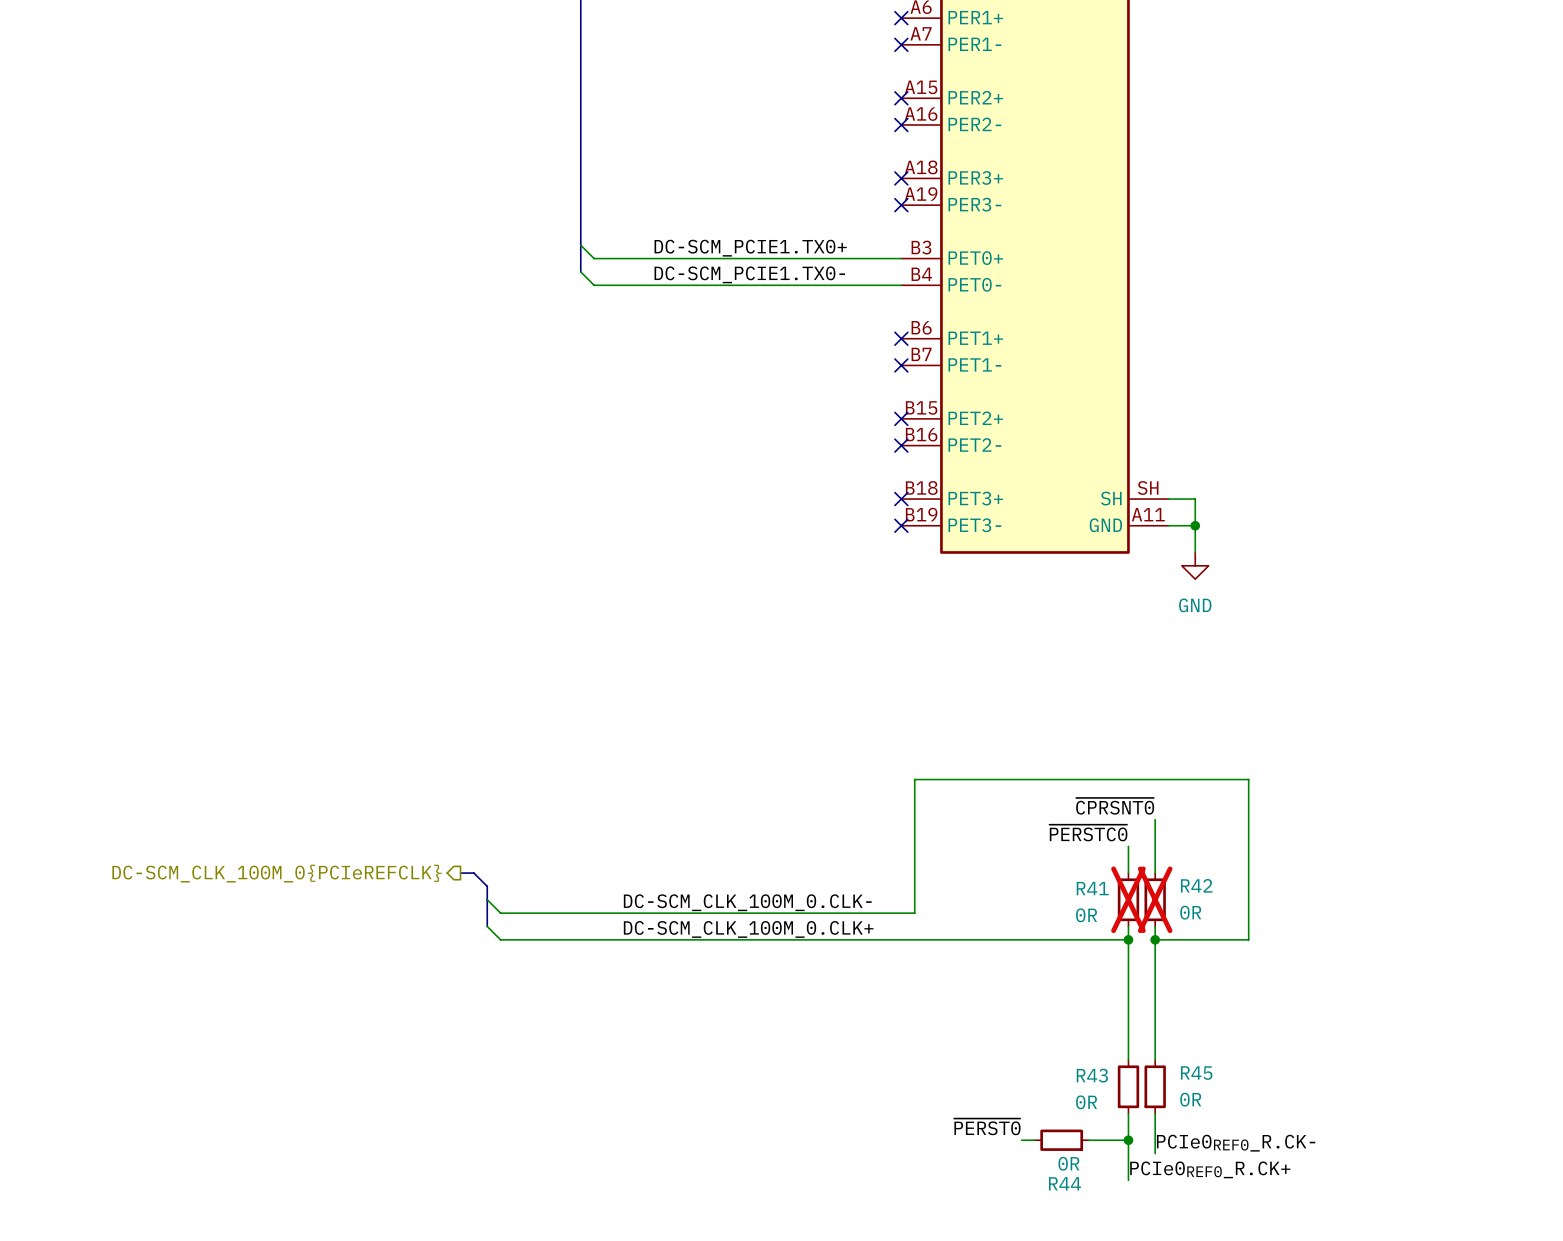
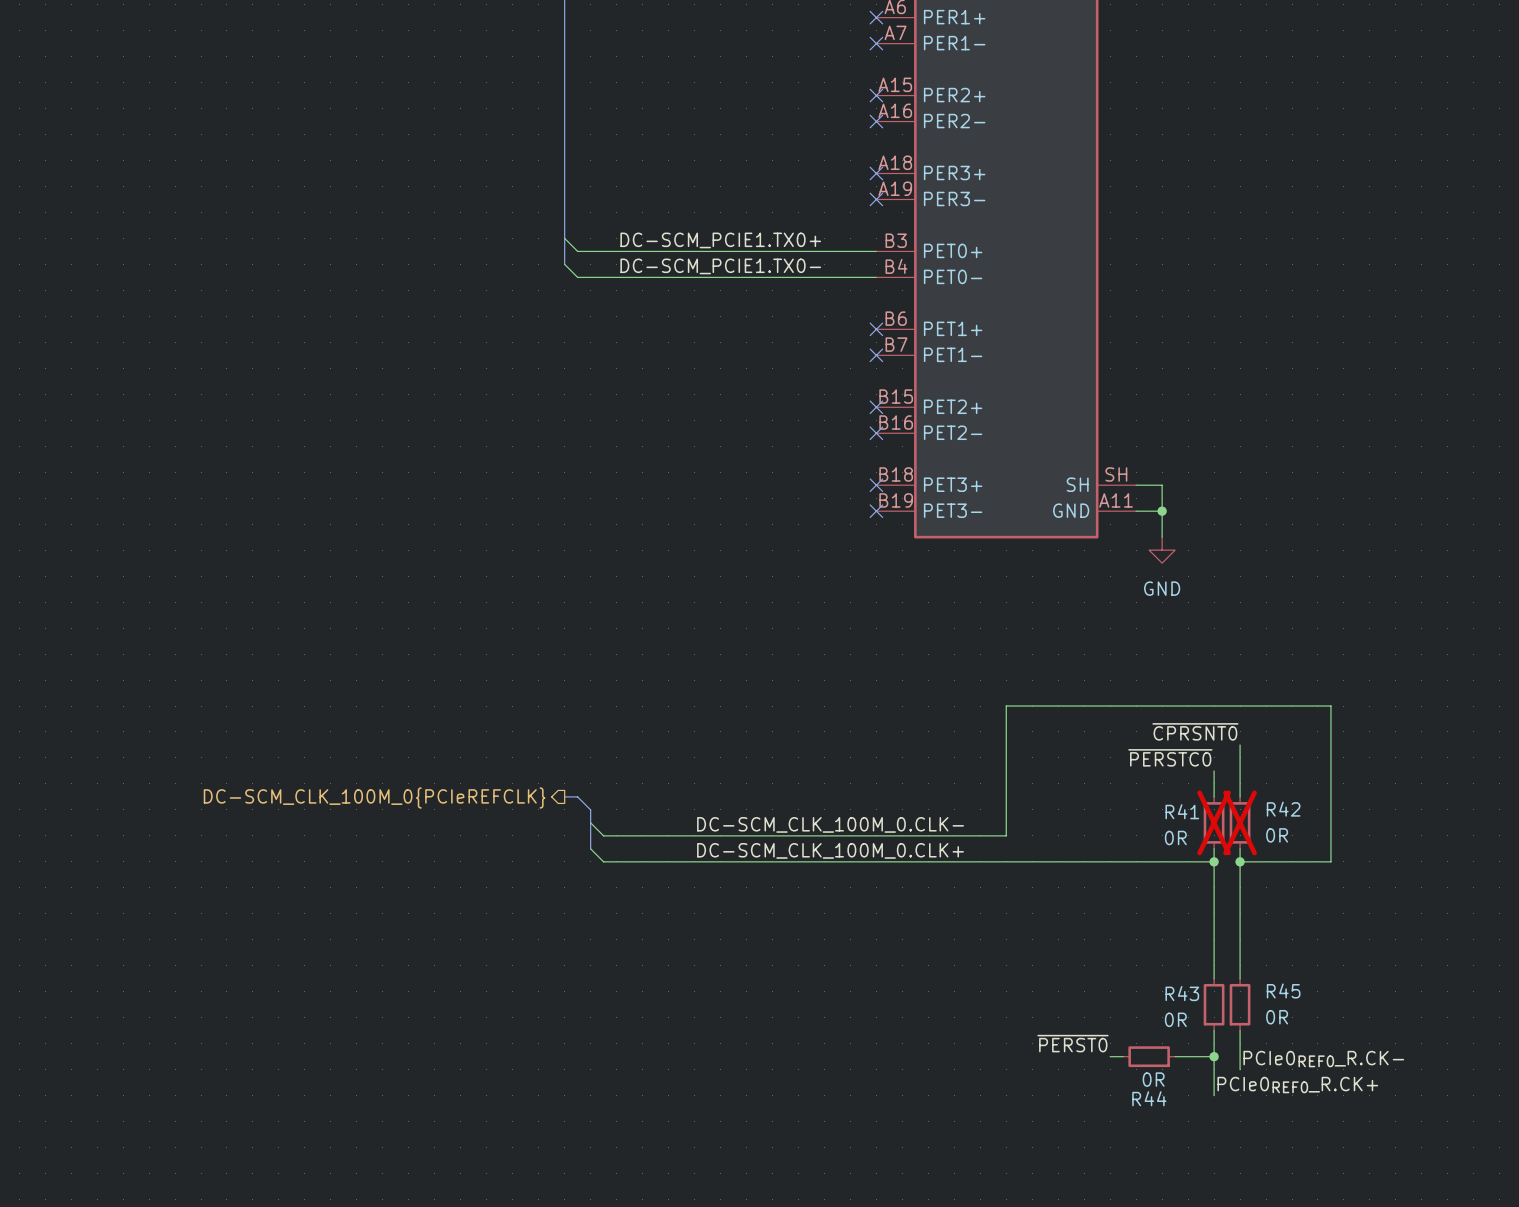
wire: (1248, 792) (1248, 779) (914, 779) (914, 913) (500, 913) (487, 899) -> none
label position: ~{CPRSNT0} (1115, 806) -> ~{CPRSNT0} (1195, 731)
wire: (1155, 819) (1155, 873) -> (1240, 744) (1240, 796)
label position: ~{PERSTC0} (1088, 833) -> ~{PERSTC0} (1170, 757)
wire: none -> (590, 822) (603, 835) (1006, 835) (1006, 706) (1330, 706) (1330, 861) (1240, 861)
wire: (1128, 846) (1128, 873) -> none
hierarchical label position: DC-SCM_CLK_100M_0{PCIeREFCLK} (276, 873) -> DC-SCM_CLK_100M_0{PCIeREFCLK} (374, 797)
bus: (460, 873) (473, 873) (487, 886) (487, 926) -> (564, 796) (577, 796) (590, 809) (590, 848)
junction: none -> (1214, 861)
junction: none -> (1240, 861)
R41 position: (1128, 899) -> (1214, 822)
R42 position: (1155, 899) -> (1240, 822)
label position: DC-SCM_CLK_100M_0.CLK- (747, 902) -> DC-SCM_CLK_100M_0.CLK- (830, 824)
wire: (487, 926) (500, 939) (1128, 939) -> (590, 848) (603, 861) (1214, 861)
wire: (1128, 926) (1128, 1060) -> none
wire: (1155, 926) (1155, 1060) -> (1240, 848) (1240, 978)
label position: DC-SCM_CLK_100M_0.CLK+ (748, 929) -> DC-SCM_CLK_100M_0.CLK+ (830, 850)
junction: (1128, 939) -> none
wire: (1155, 939) (1248, 939) -> (1214, 978) (1214, 913)
junction: (1155, 939) -> none
R43 position: (1128, 1086) -> (1214, 1004)
R45 position: (1155, 1086) -> (1240, 1004)
junction: none -> (1214, 1056)
wire: (1128, 1113) (1128, 1180) -> (1214, 1030) (1214, 1095)
wire: (1155, 1113) (1155, 1153) -> (1240, 1030) (1240, 1069)
label position: ~{PERST0} (987, 1126) -> ~{PERST0} (1072, 1043)
wire: (1021, 1140) (1034, 1140) -> (1110, 1056) (1123, 1056)
R44 position: (1061, 1140) -> (1149, 1056)
wire: (1088, 1140) (1128, 1140) -> (1175, 1056) (1214, 1056)
junction: (1128, 1140) -> none
label position: PCIe0REF0_R.CK- (1236, 1143) -> PCIe0REF0_R.CK- (1323, 1059)
label position: PCIe0REF0_R.CK+ (1210, 1169) -> PCIe0REF0_R.CK+ (1297, 1085)

